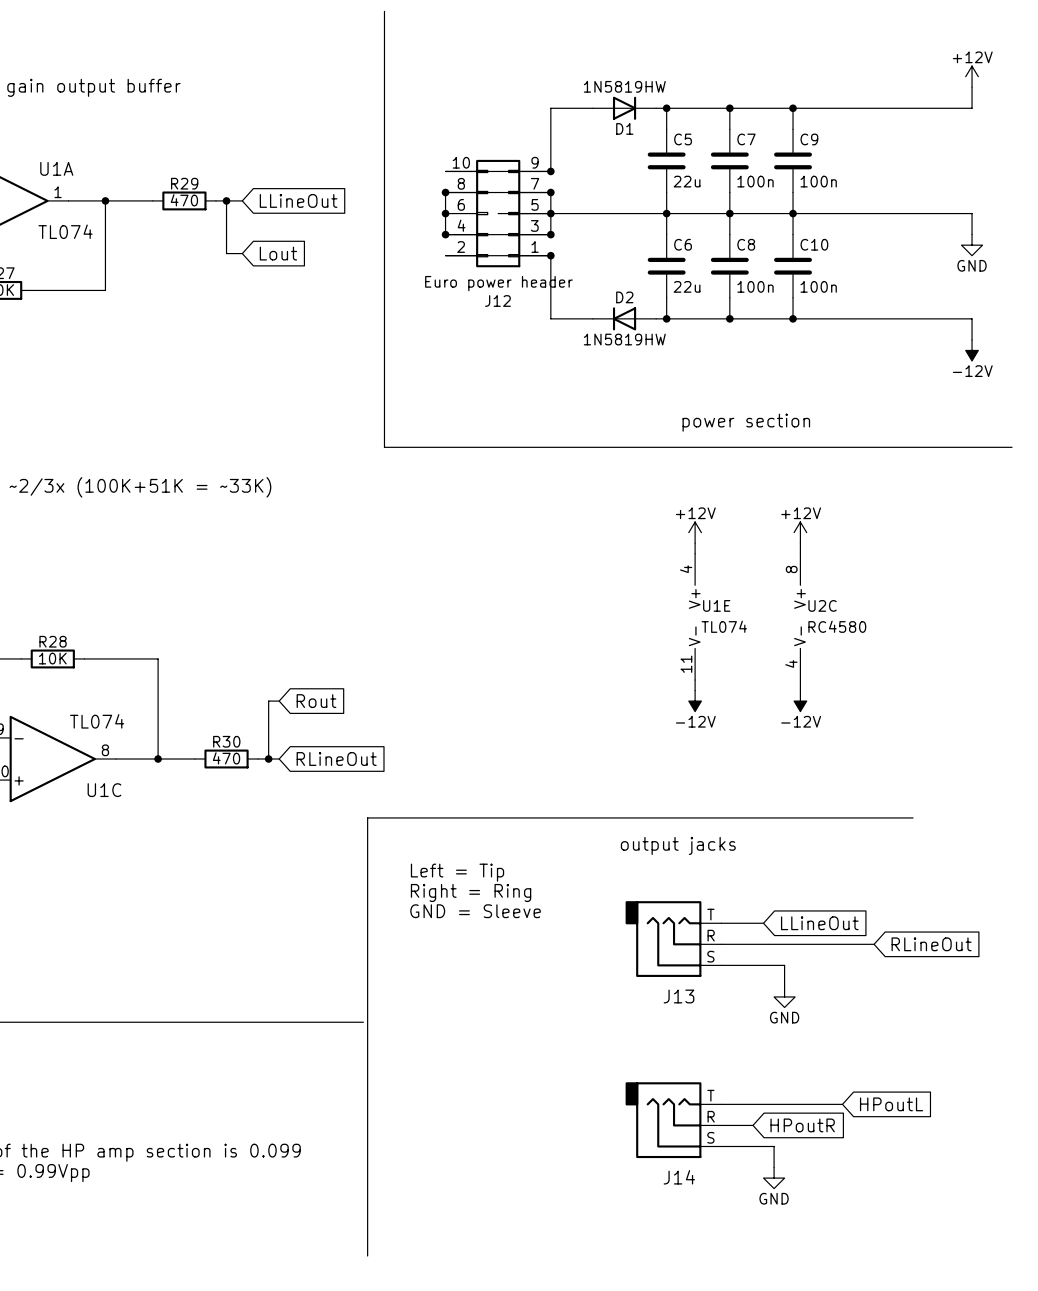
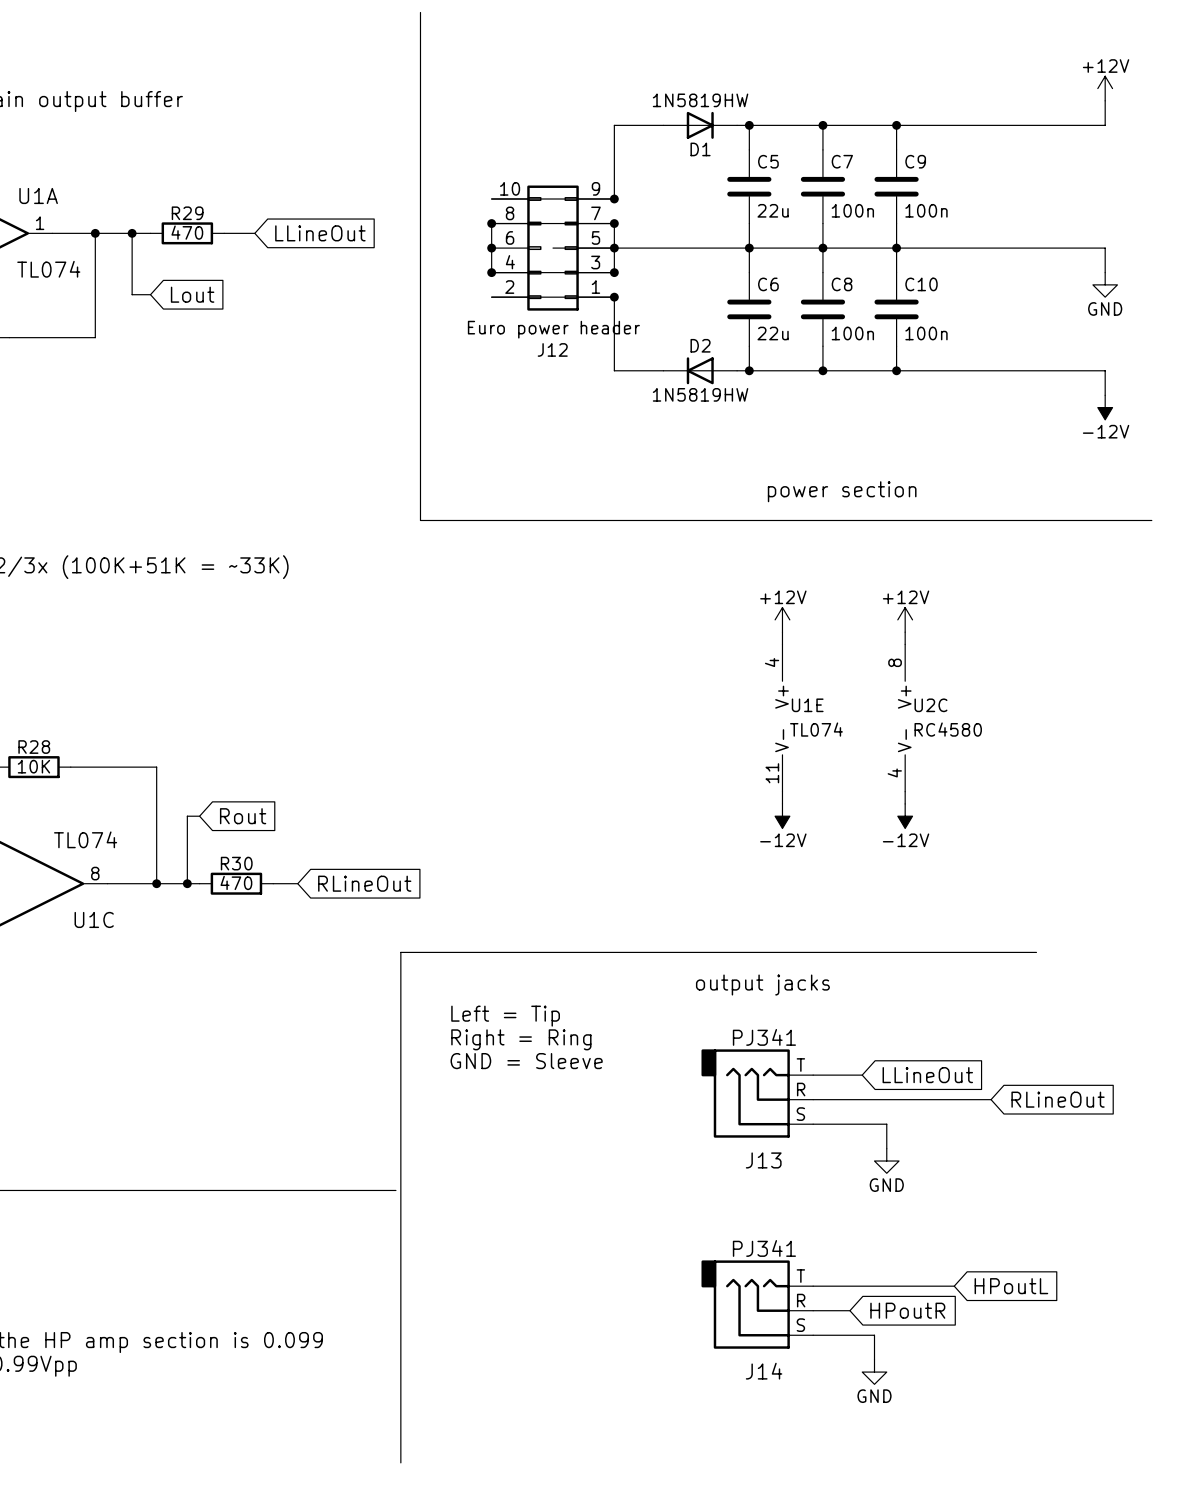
junction: none -> (132, 233)
wire: (226, 200) (226, 253) (242, 253) -> (132, 233) (132, 294) (150, 294)
junction: (226, 200) -> none
global label position: Lout (278, 253) -> Lout (192, 294)
wire: (279, 701) (268, 701) (268, 759) -> (199, 816) (187, 816) (187, 883)
global label position: Rout (316, 701) -> Rout (243, 816)
junction: none -> (187, 883)
junction: (268, 759) -> none
J13 value: none -> PJ341 (764, 1037)
J14 value: none -> PJ341 (764, 1248)

